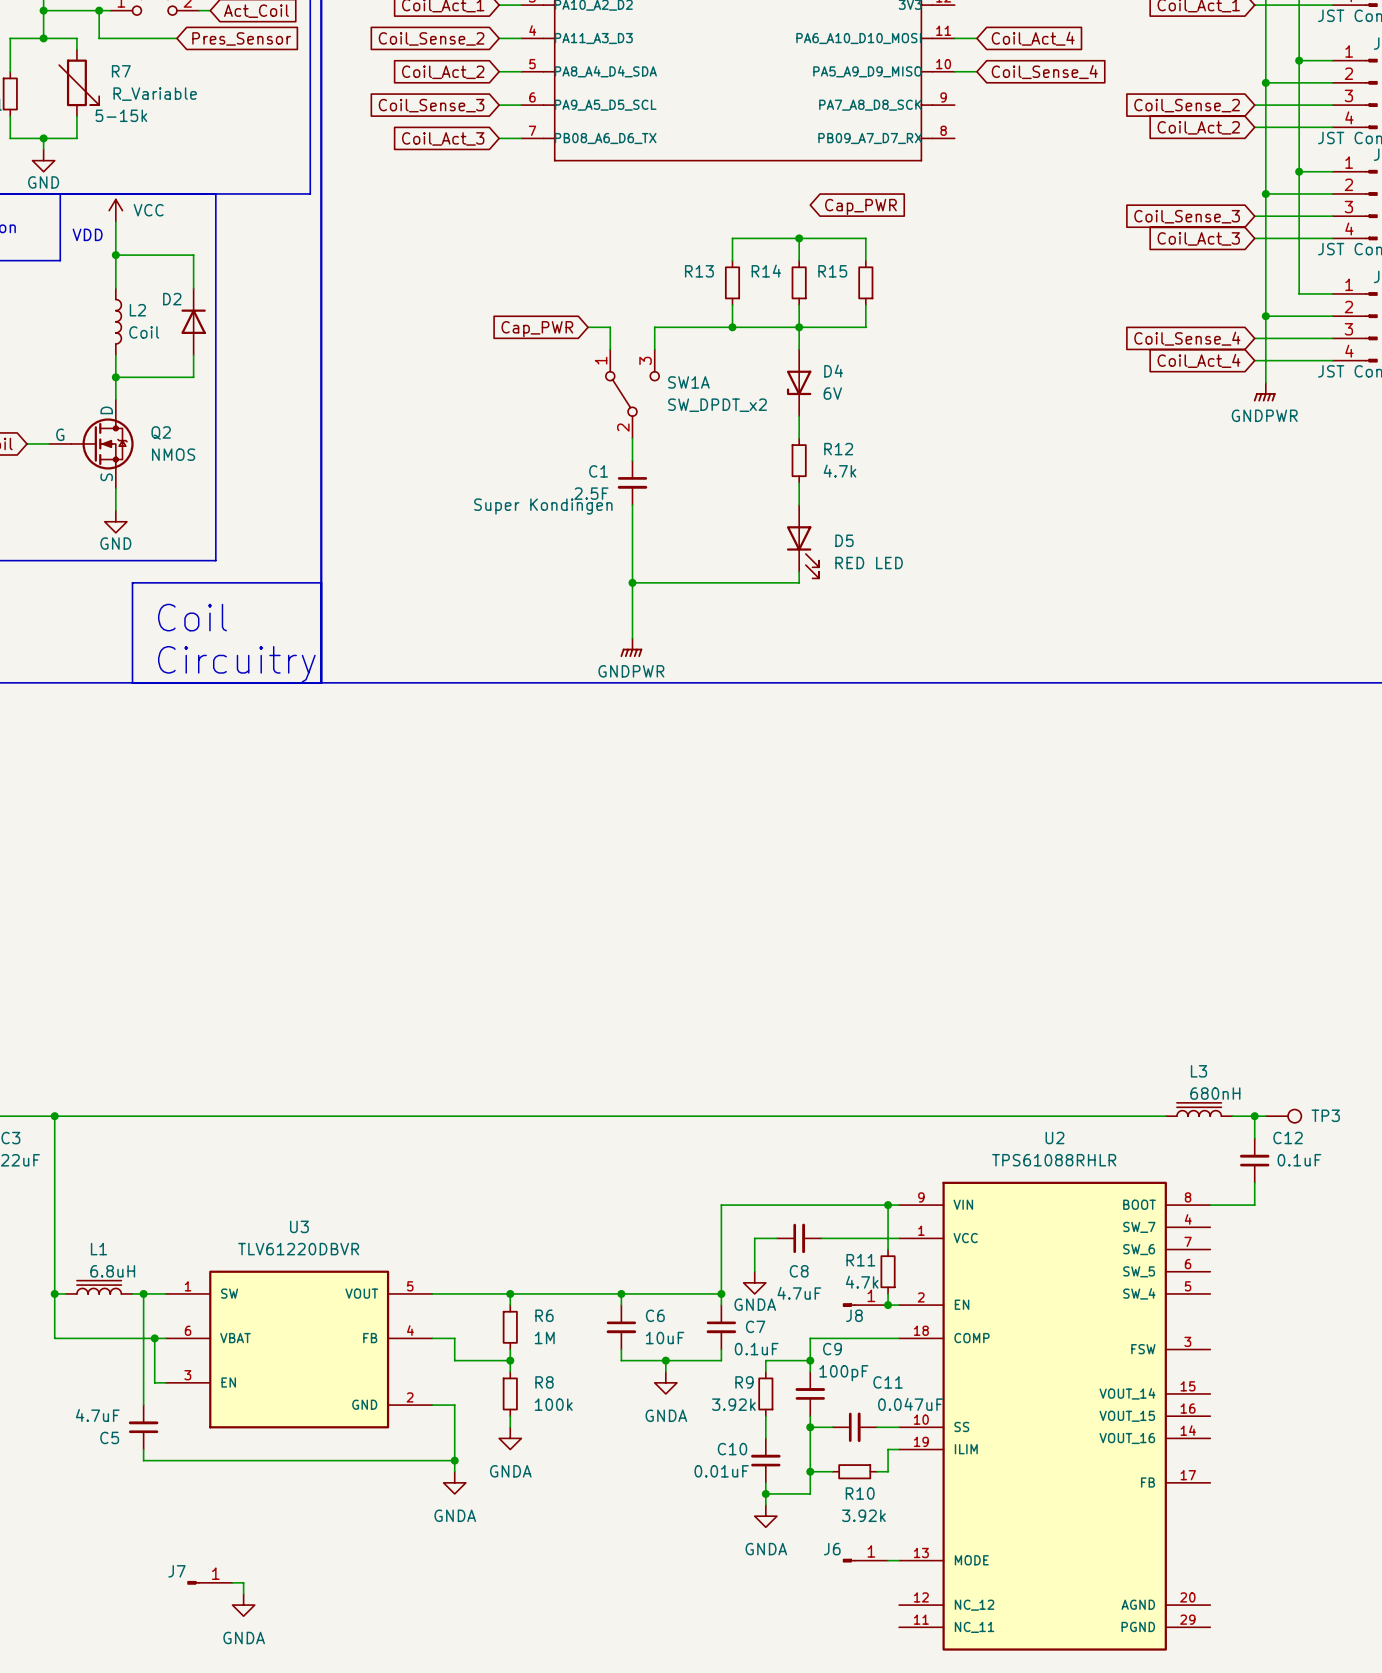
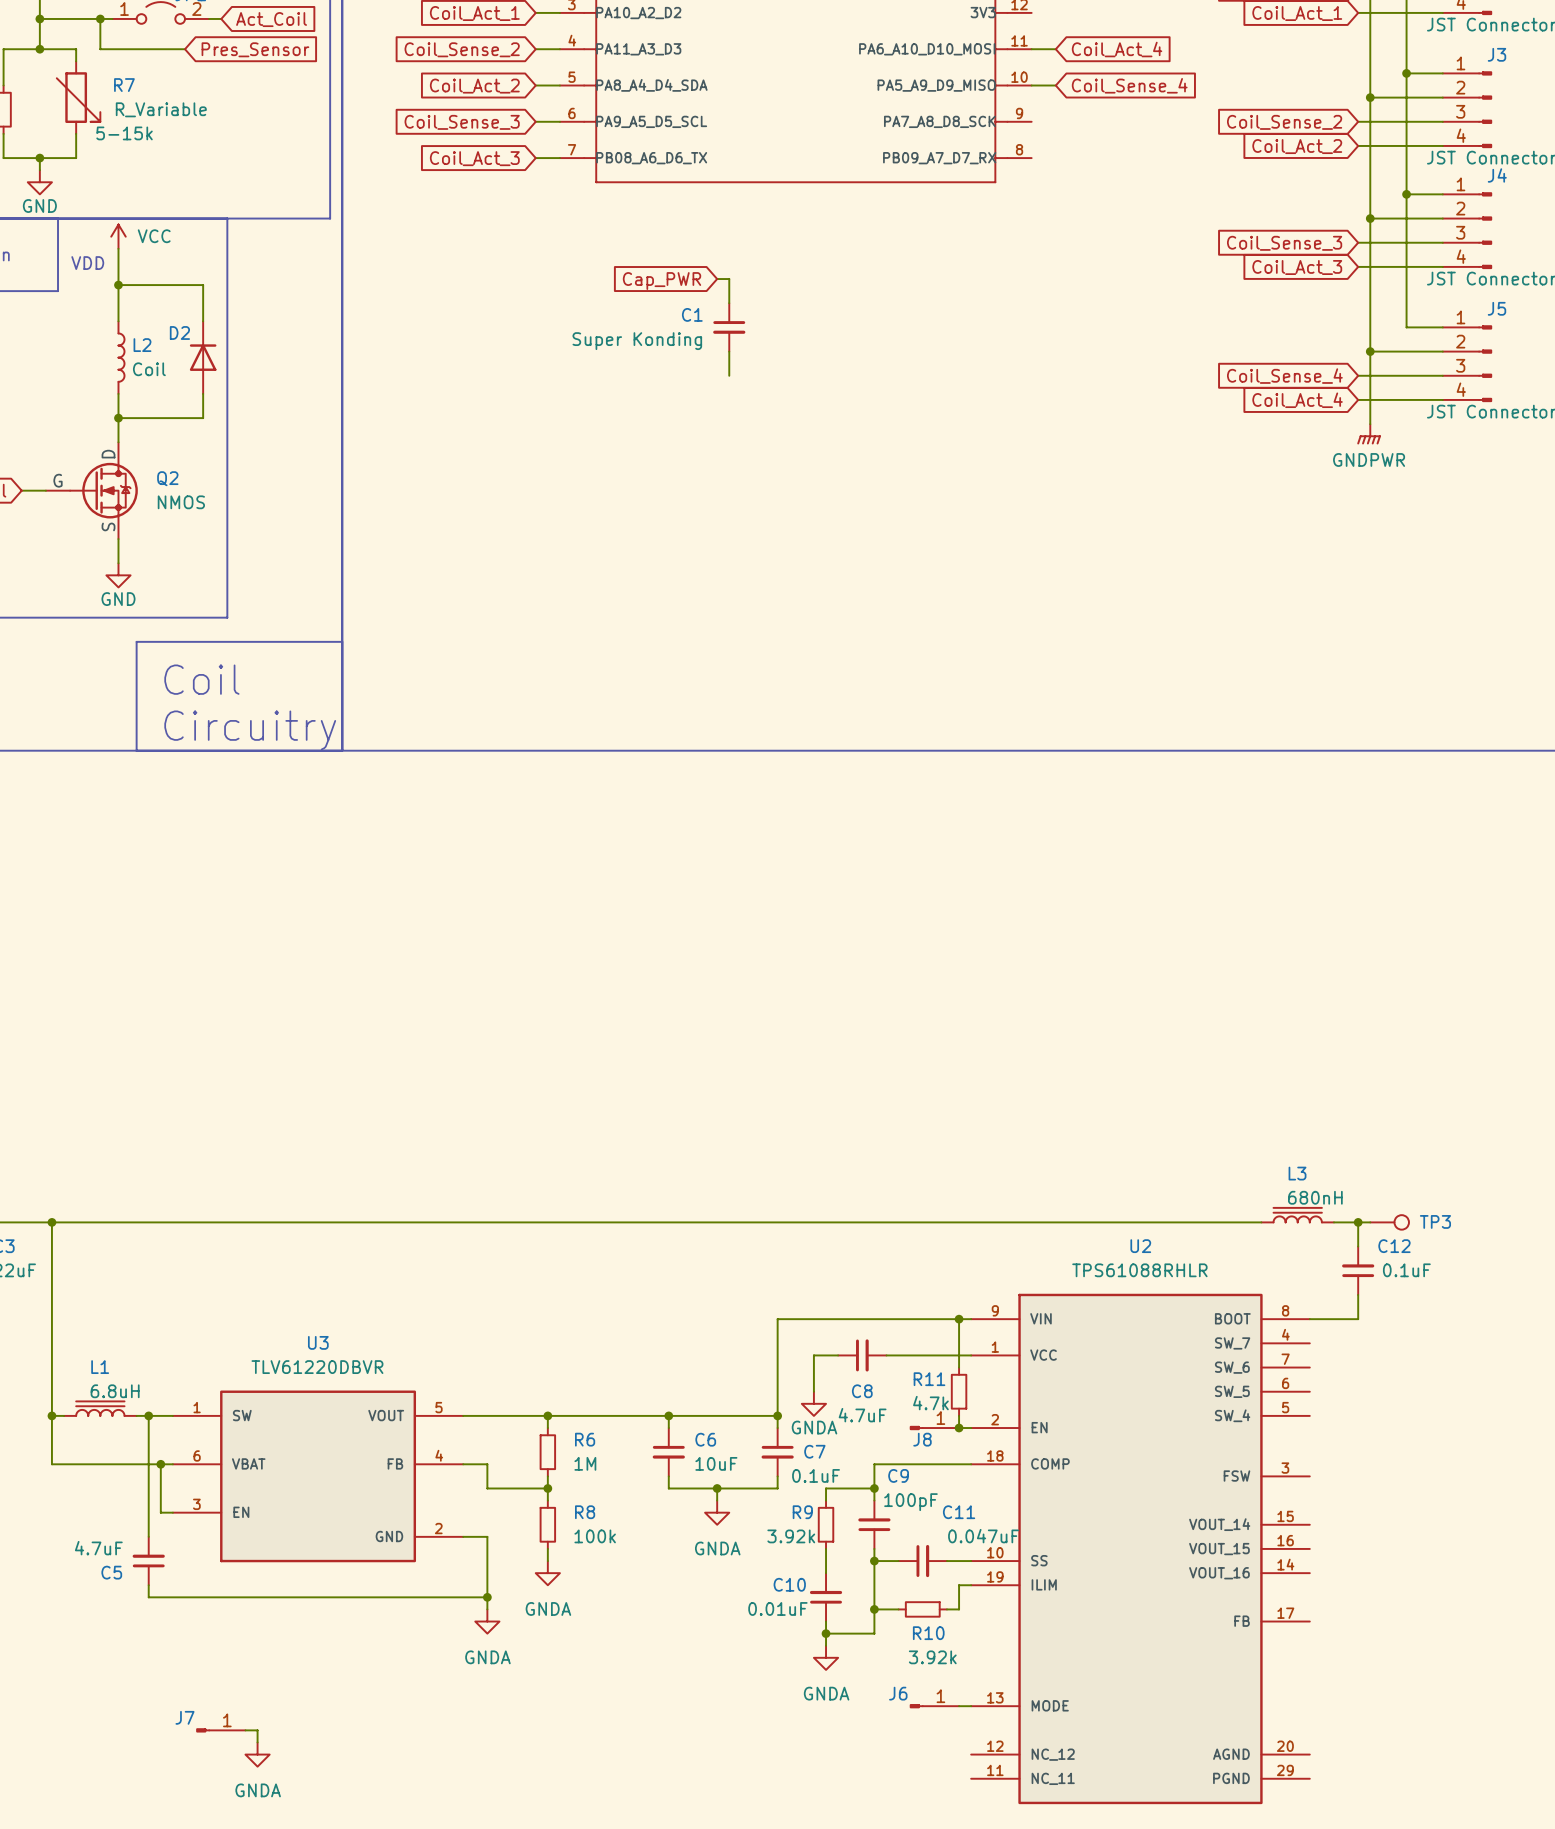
global label: Cap_PWR (860, 206) -> none
wire: (799, 238) (799, 260) -> none
junction: (799, 238) -> none
wire: none -> (717, 279) (729, 279) (729, 303)
global label: none -> Cap_PWR (662, 281)
wire: (732, 260) (732, 238) (865, 238) (865, 260) -> none
R13: (732, 282) -> none
R14: (799, 282) -> none
R15: (865, 282) -> none
wire: (732, 305) (732, 327) -> (729, 351) (729, 375)
wire: (799, 305) (799, 349) -> none
wire: (865, 305) (865, 327) (654, 327) (654, 349) -> none
wire: (588, 327) (610, 327) (610, 349) -> none
junction: (732, 327) -> none
junction: (799, 327) -> none
global label: Cap_PWR (537, 329) -> none
D4: 6V (799, 382) -> none
SW1A: SW_DPDT_x2 (632, 393) -> none
wire: (799, 416) (799, 438) -> none
wire: (632, 438) (632, 460) -> none
R12: 4.7k (799, 460) -> none
C1 position: (632, 482) -> (729, 327)
wire: (799, 482) (799, 505) -> none
C1 value: 2.5F (591, 493) -> Super Konding (637, 341)
wire: (632, 505) (632, 638) -> none
C1 text: Super Kondingen (543, 506) -> none
D5: RED LED (803, 541) -> none
wire: (799, 571) (799, 582) (632, 582) -> none
junction: (632, 582) -> none
power symbol: GNDPWR (631, 647) -> none

